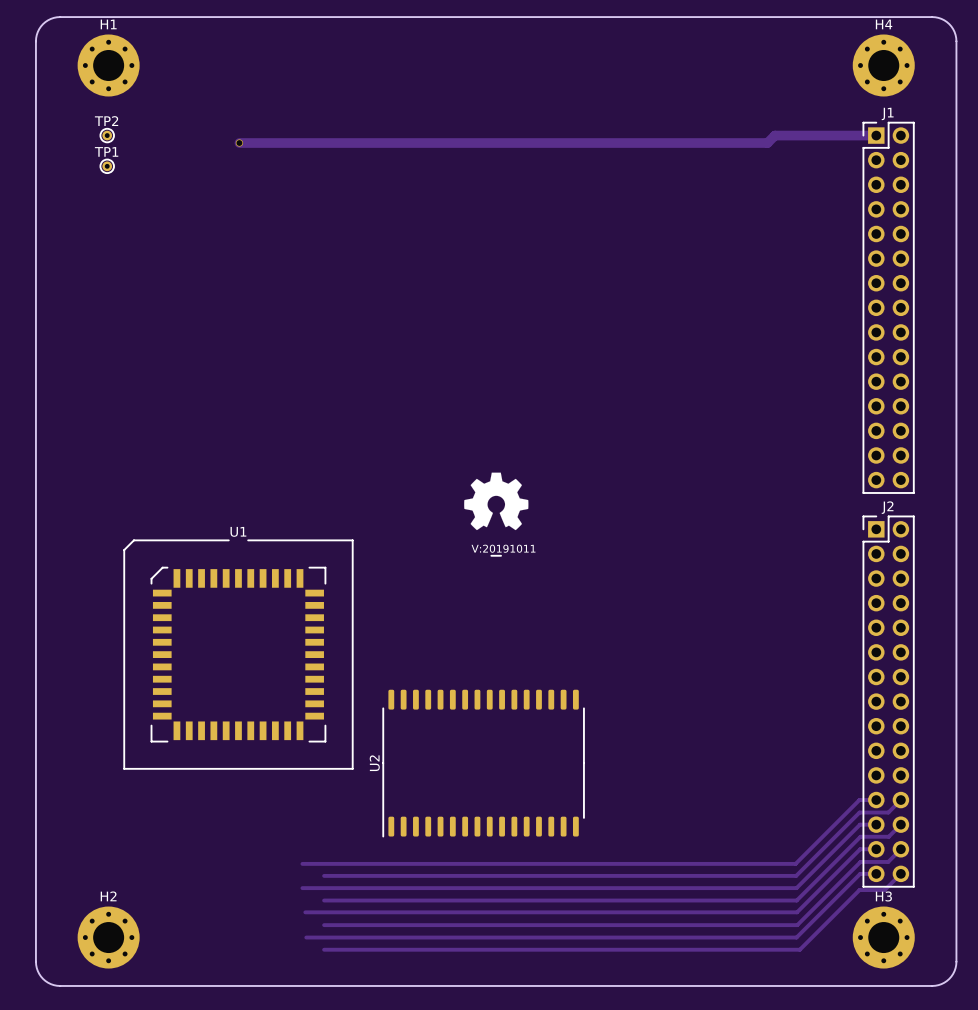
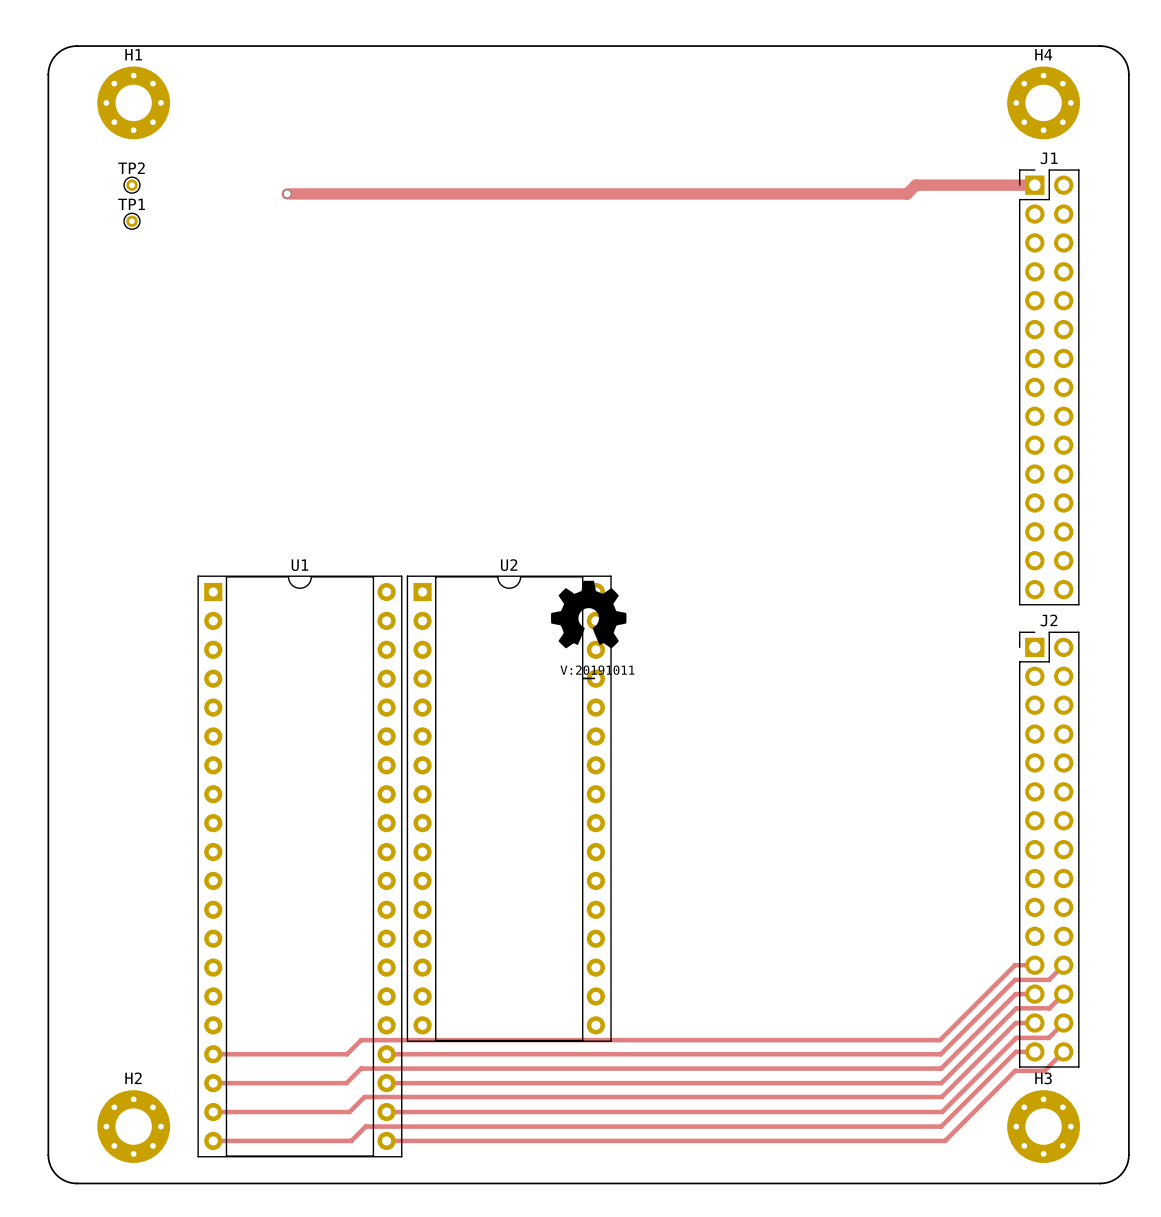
U1 name position: U1 (238, 531) -> U1 (299, 565)
U1 footprint: [123, 539, 354, 770] -> [197, 575, 403, 1158]
U2 footprint: [382, 689, 585, 838] -> [406, 575, 612, 1042]
U2 name position: U2 (374, 763) -> U2 (509, 565)
track: none -> (361, 1040) (347, 1054) (213, 1054)
track: none -> (361, 1068) (346, 1083) (213, 1083)
track: none -> (364, 1097) (349, 1112) (213, 1112)
track: none -> (365, 1126) (351, 1140) (213, 1140)

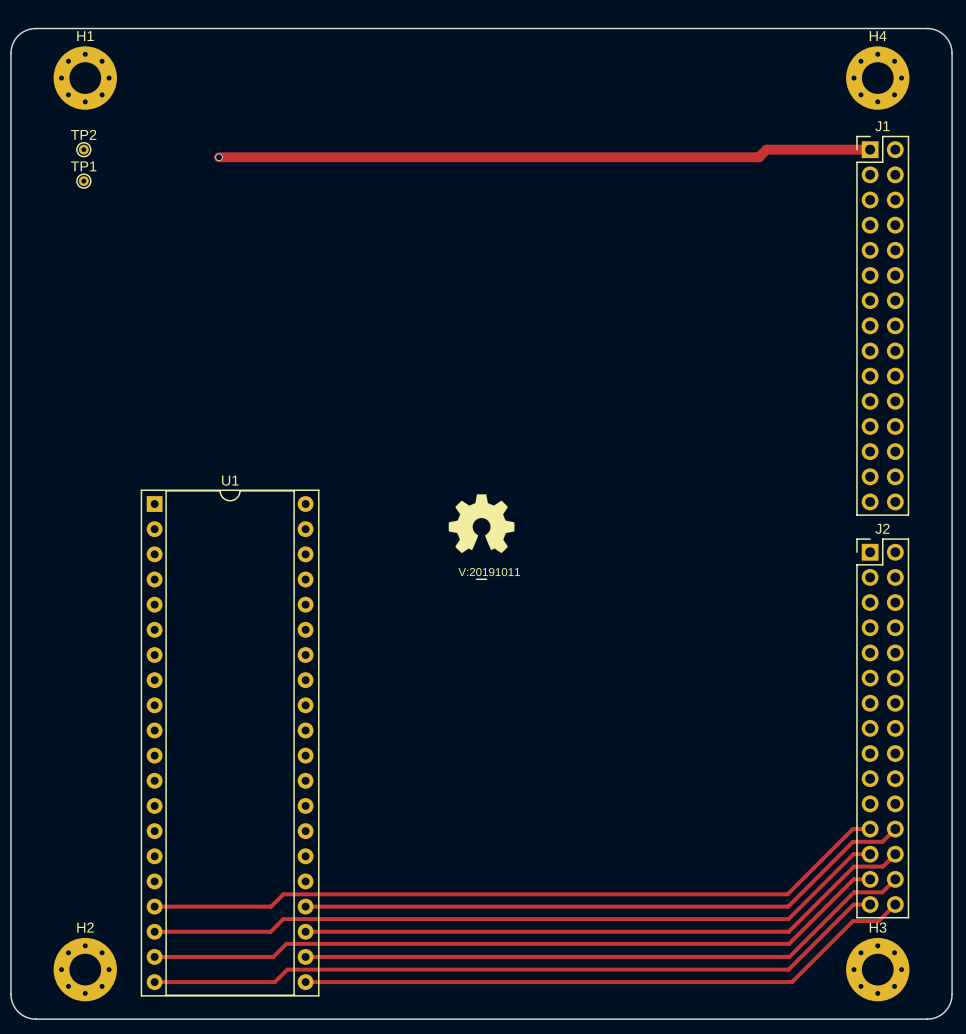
U2: (509, 808) -> none

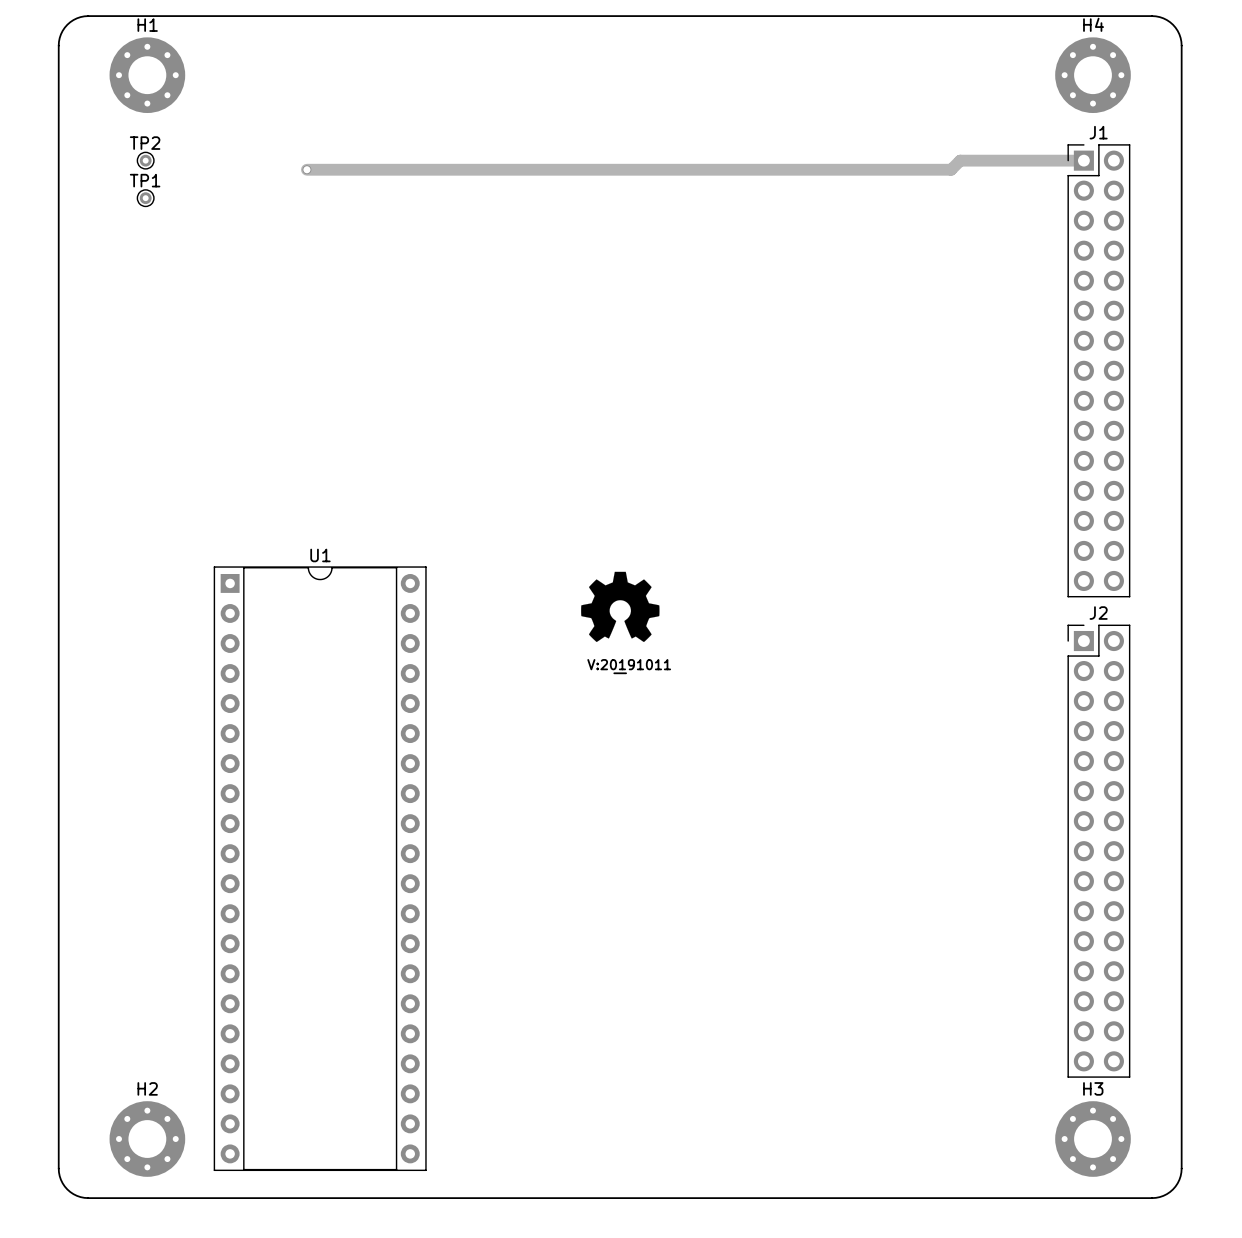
track: (870, 829) (852, 829) (787, 894) (283, 894) (271, 906) (154, 906) -> none
track: (895, 829) (882, 841) (853, 841) (788, 906) (305, 906) -> none
track: (870, 854) (853, 854) (788, 919) (283, 919) (270, 931) (154, 931) -> none
track: (895, 854) (882, 866) (853, 866) (788, 931) (305, 931) -> none
track: (870, 879) (853, 879) (789, 943) (286, 943) (273, 956) (154, 956) -> none
track: (895, 879) (882, 892) (853, 892) (789, 956) (305, 956) -> none
track: (870, 904) (853, 904) (788, 969) (287, 969) (274, 982) (154, 982) -> none
track: (895, 904) (878, 921) (853, 921) (791, 982) (305, 982) -> none

